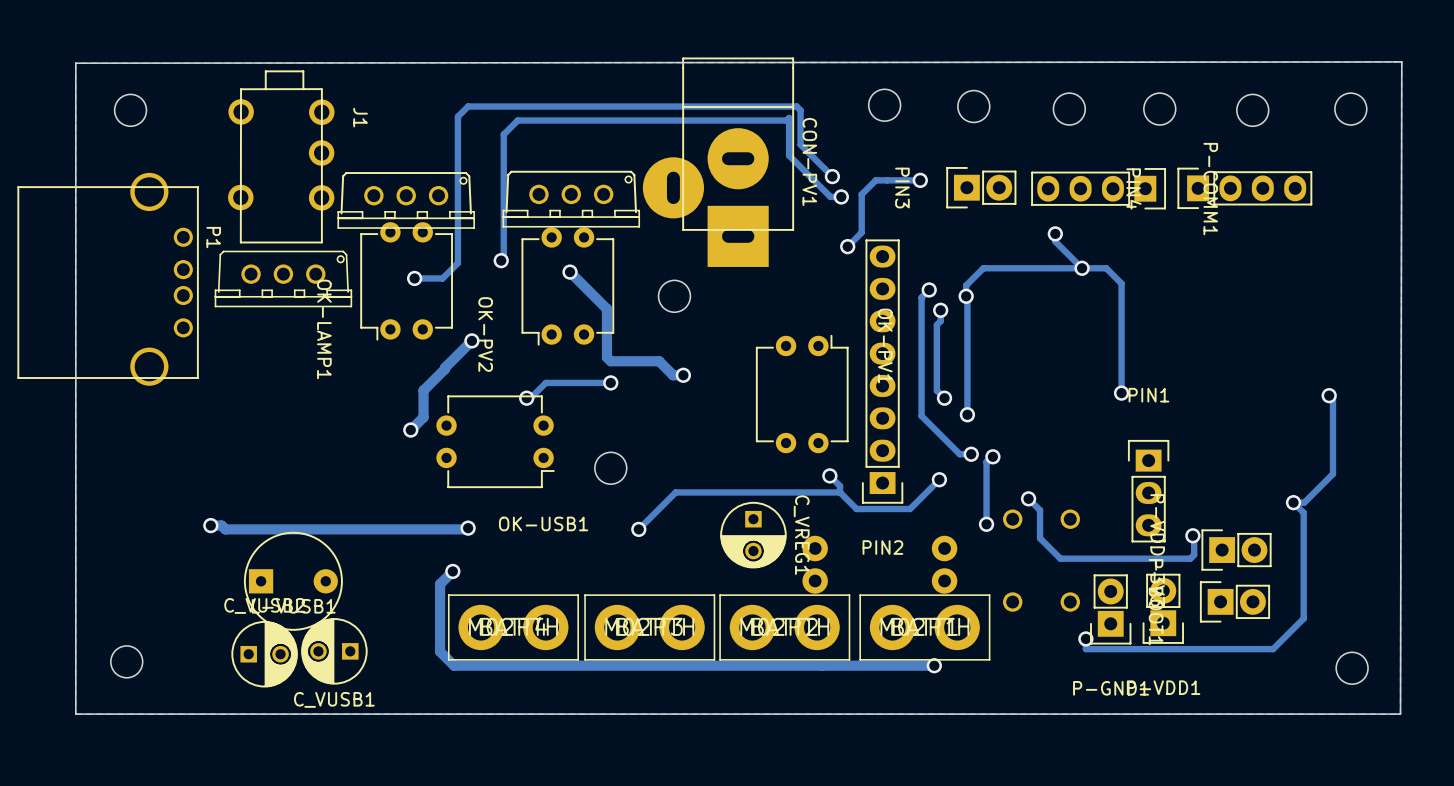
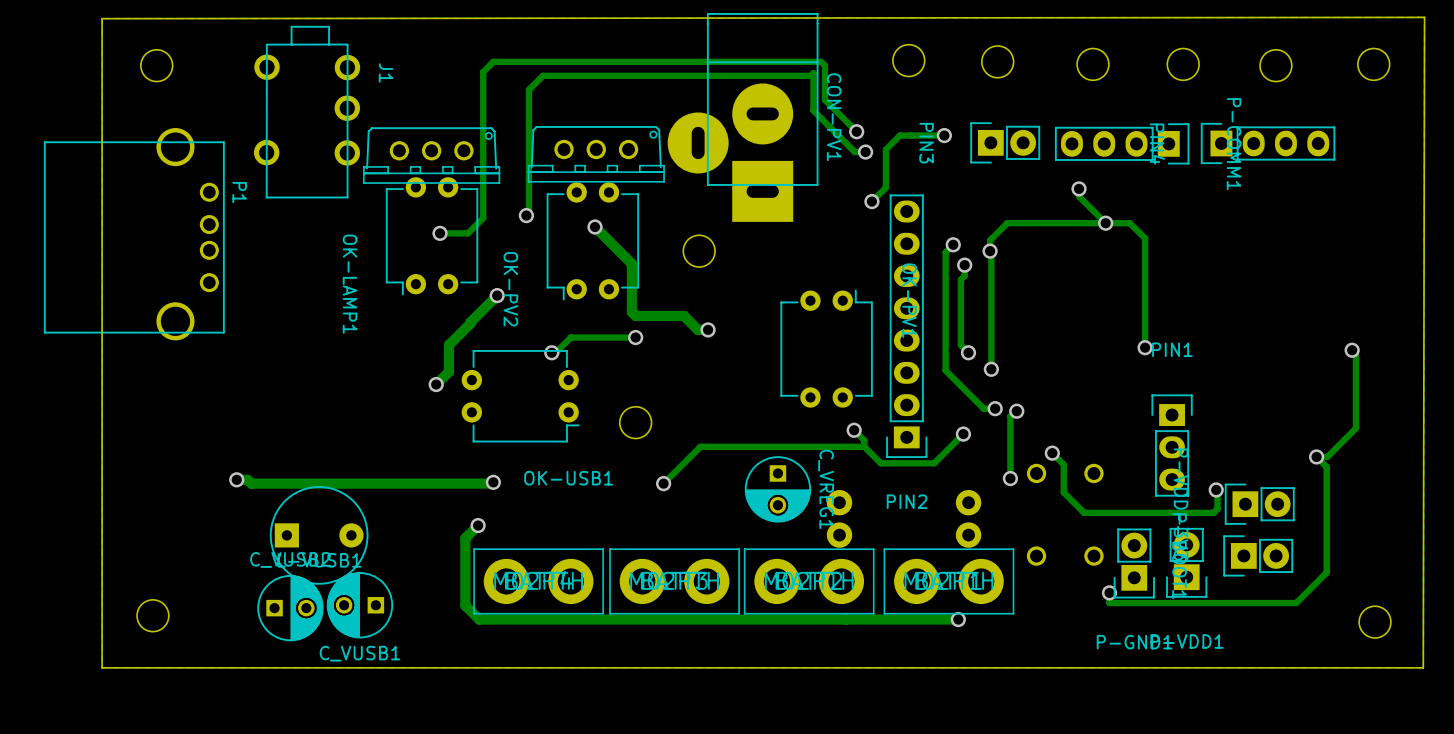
part: (283, 278) -> none

